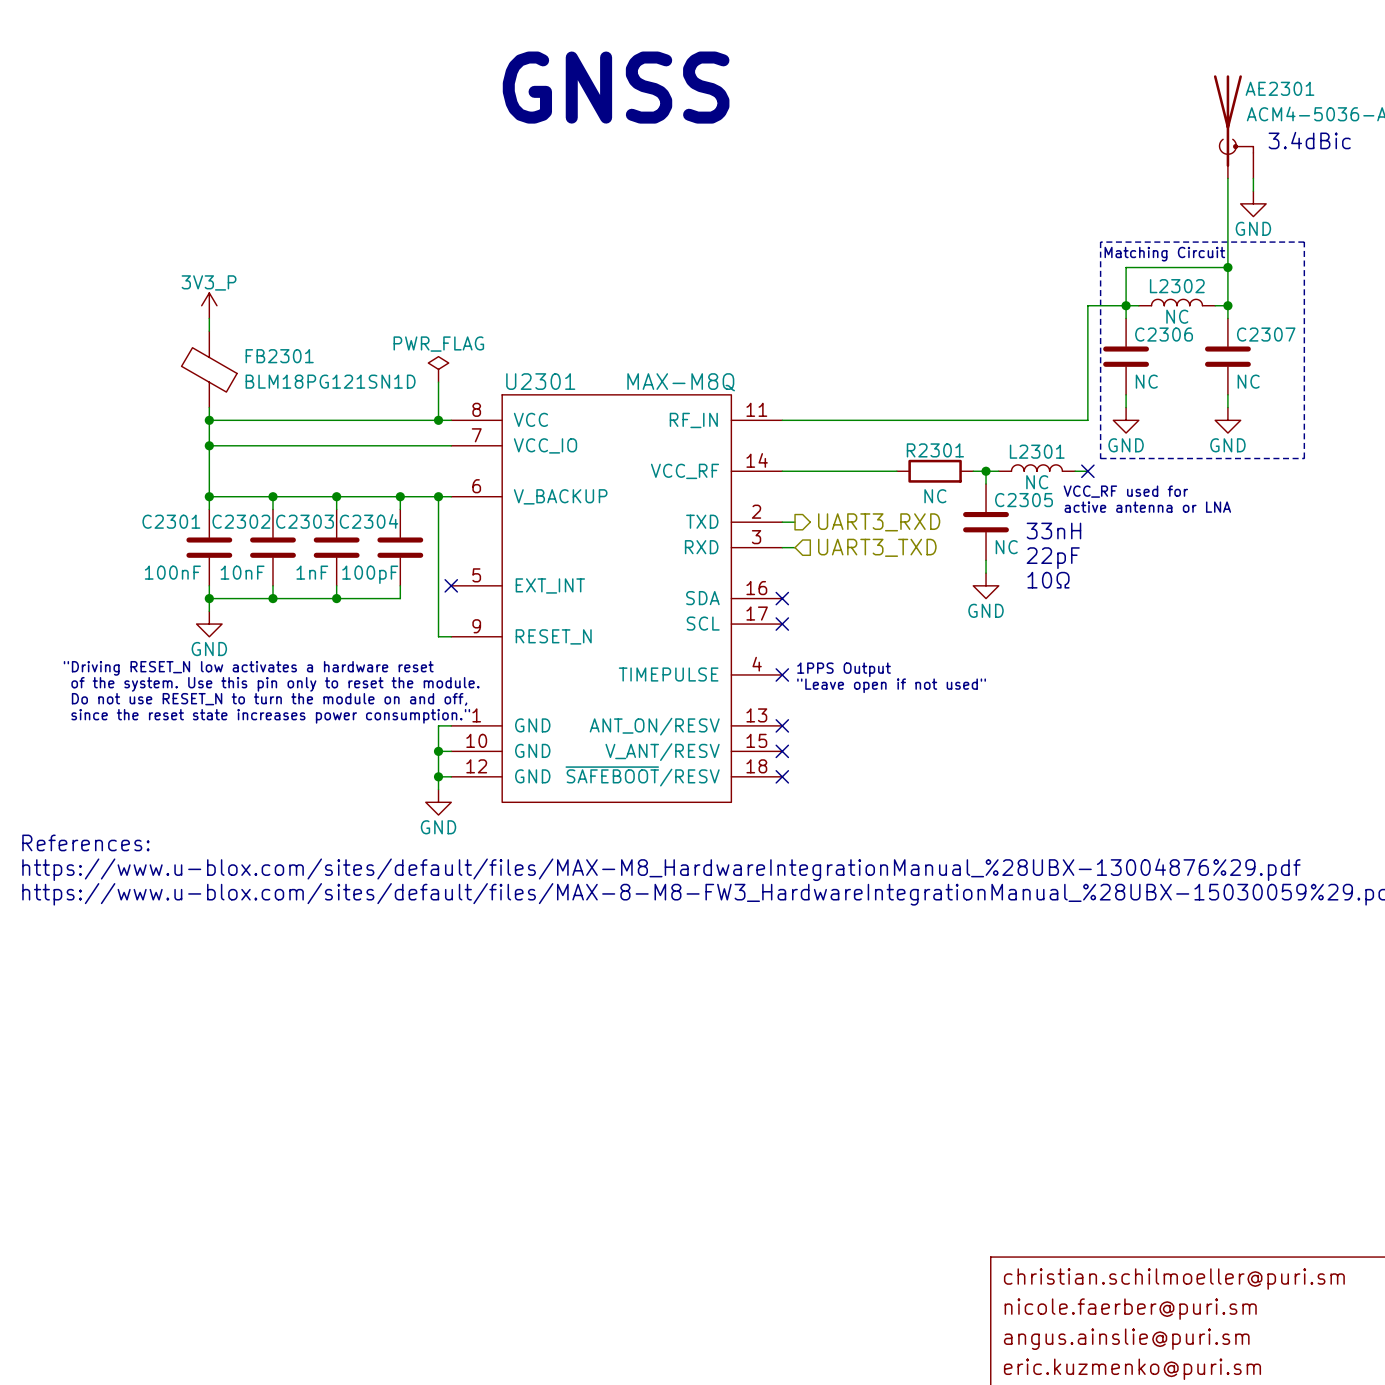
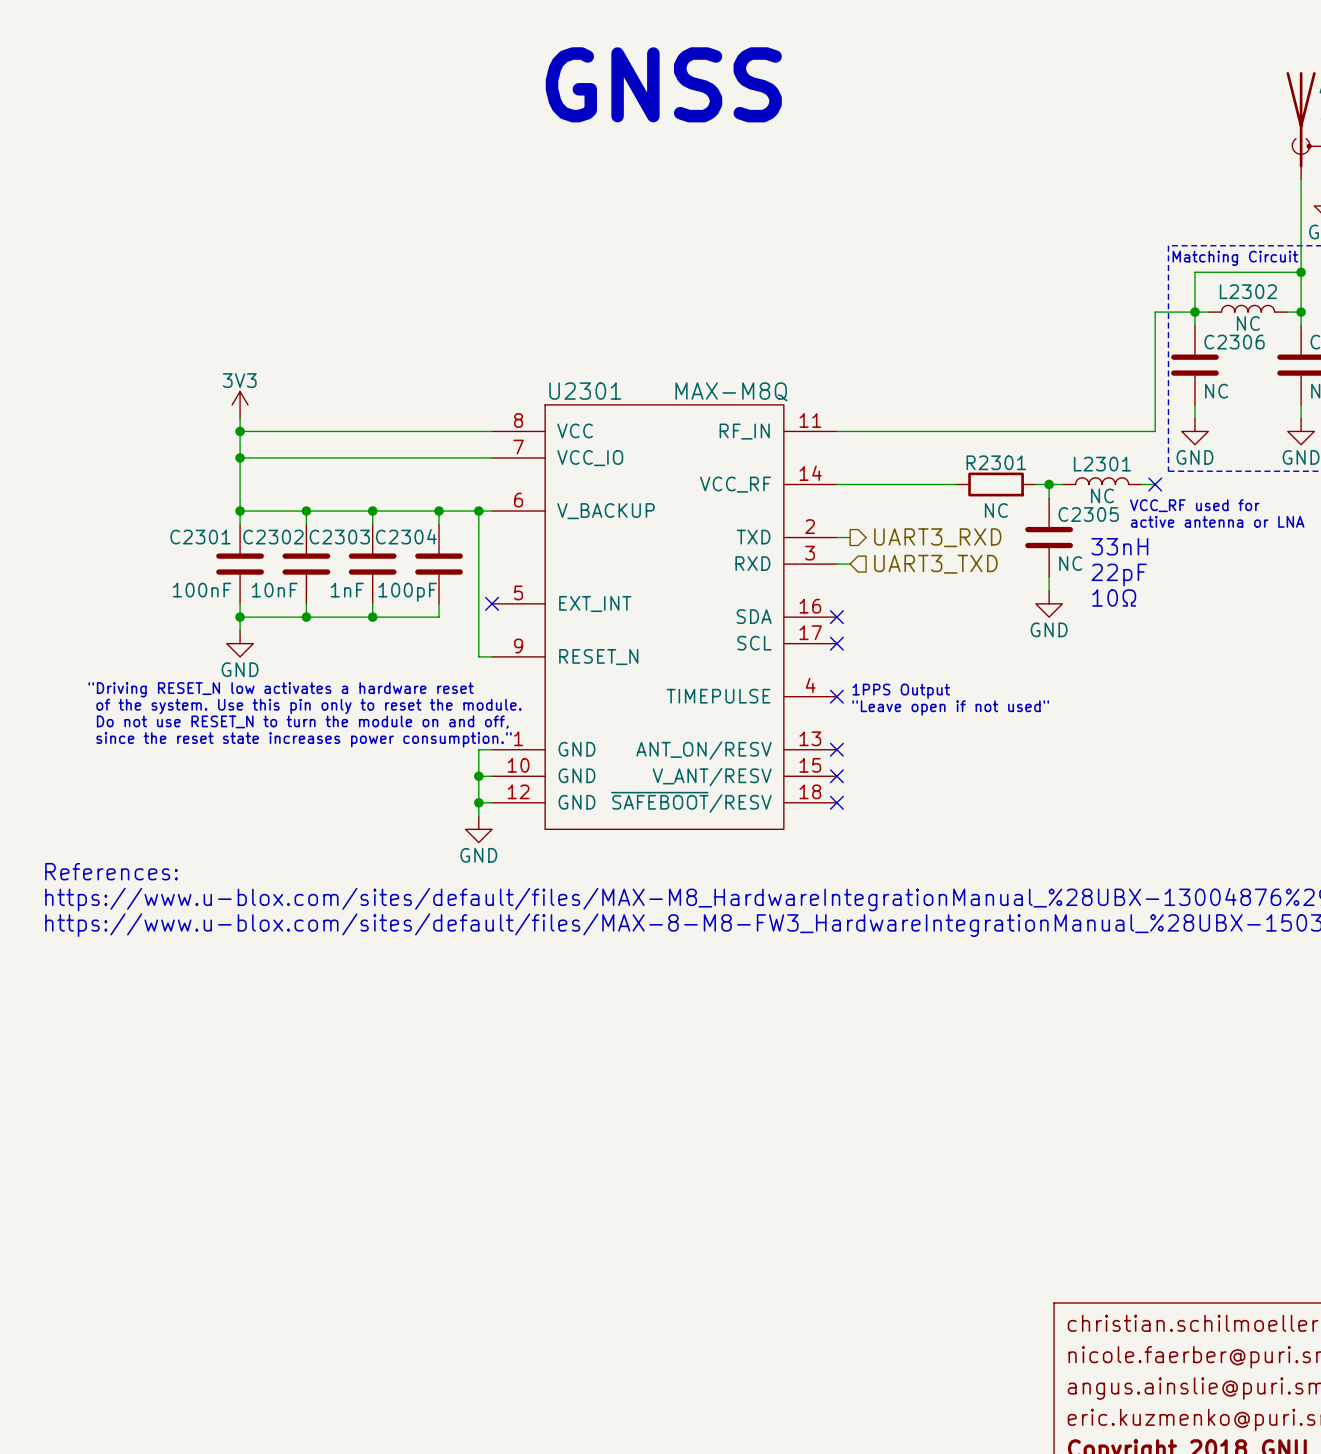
power symbol: 3V3_P (209, 305) -> none
wire: (209, 318) (209, 331) -> none
FB2301: BLM18PG121SN1D (209, 369) -> none
power symbol: PWR_FLAG (438, 369) -> none
wire: (438, 382) (438, 420) -> none
power symbol: none -> 3V3 (240, 404)
junction: (438, 420) -> none

